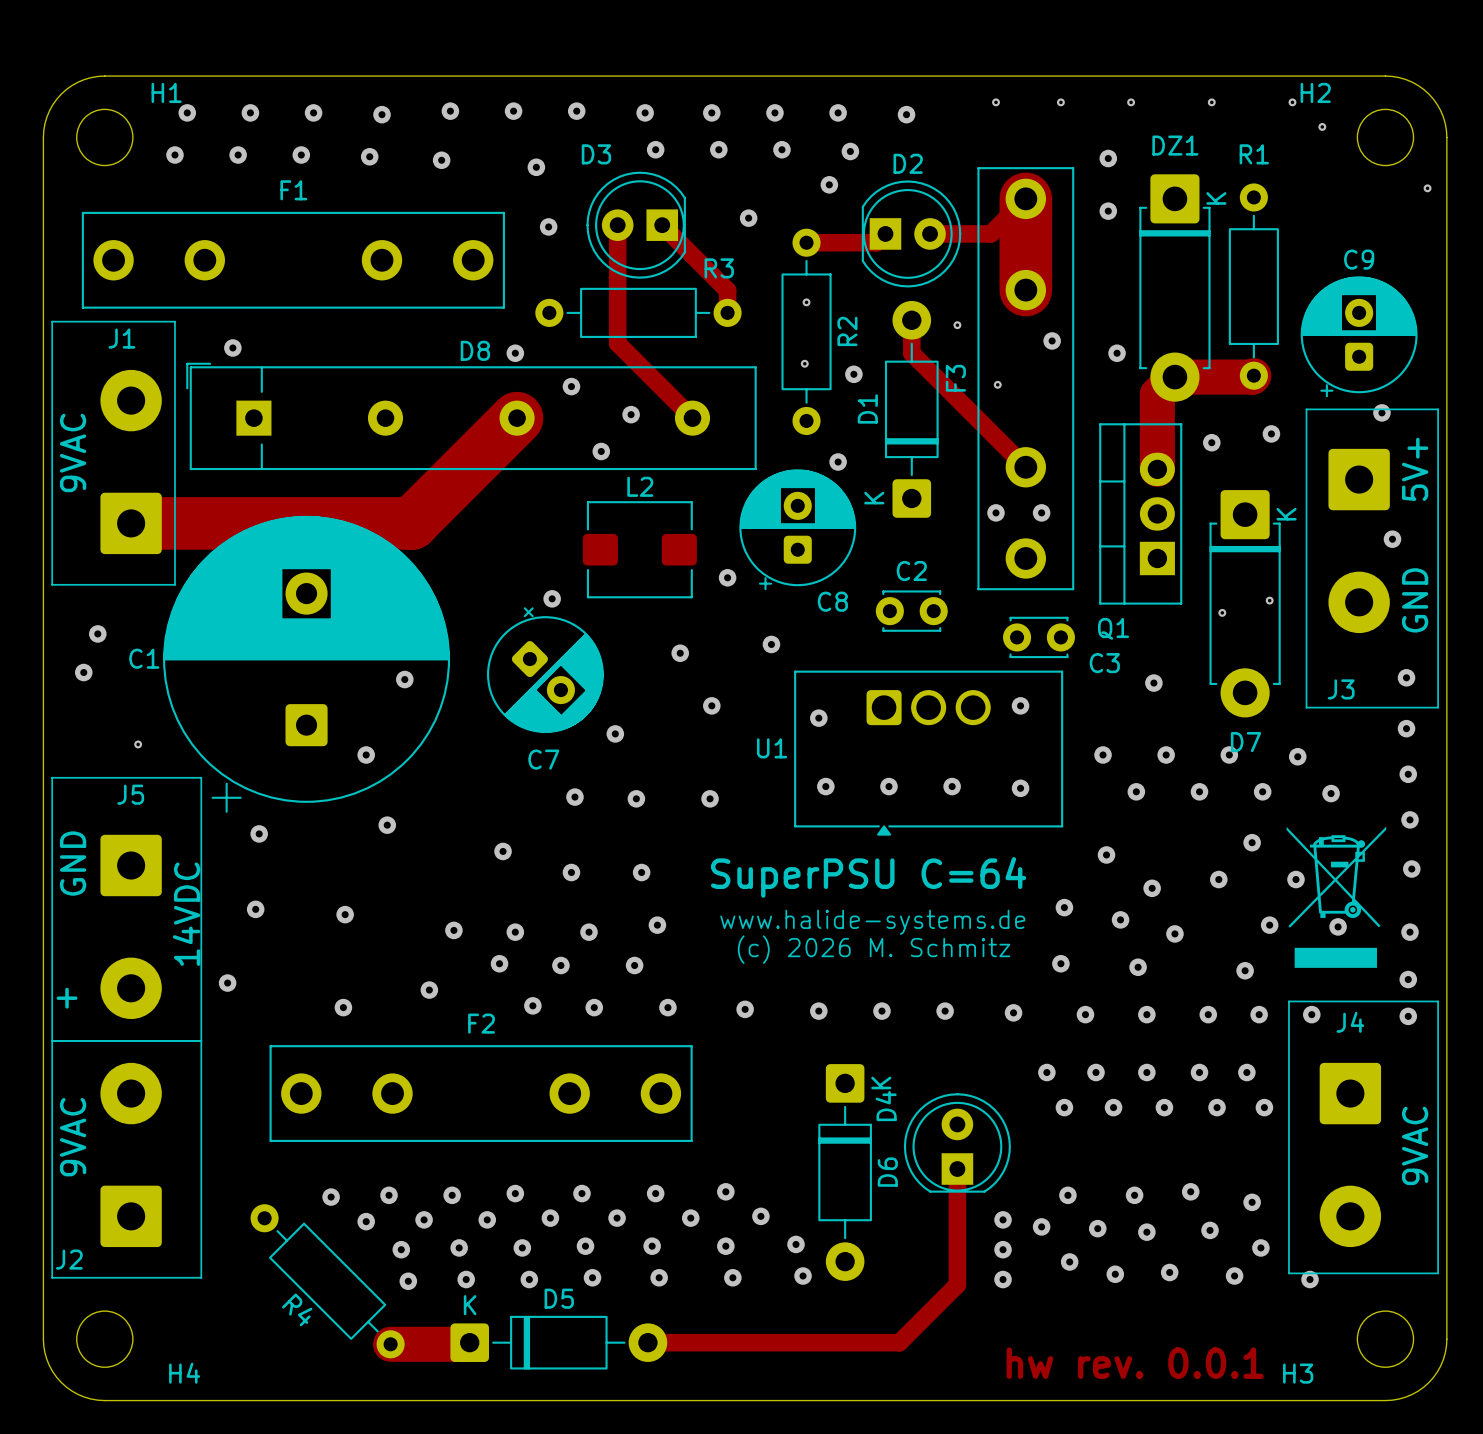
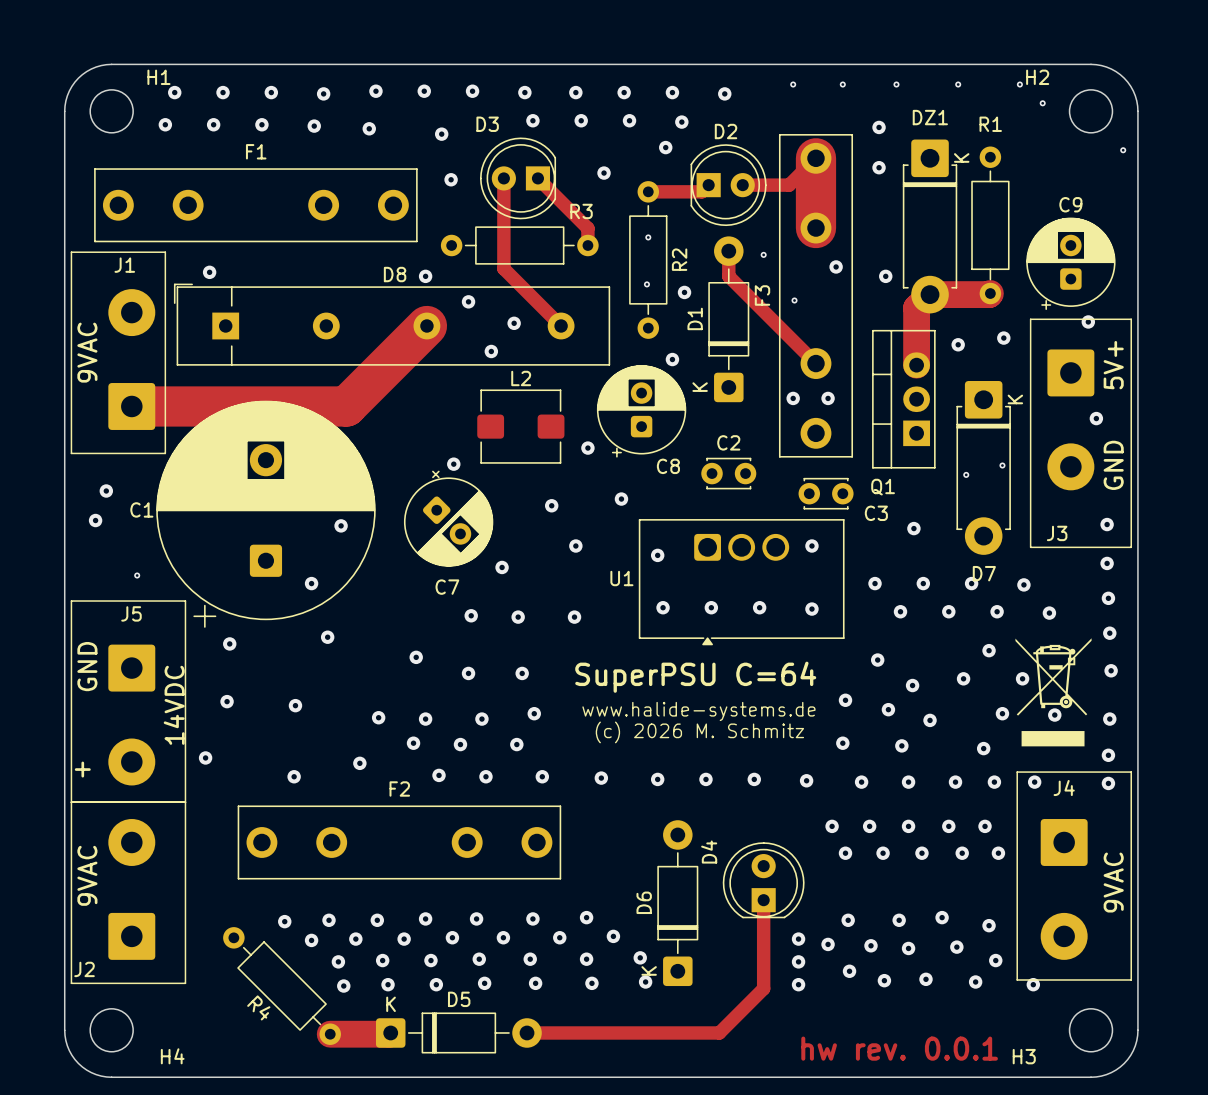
D6 rotation: 0° (845, 1172) -> 180° (677, 903)

